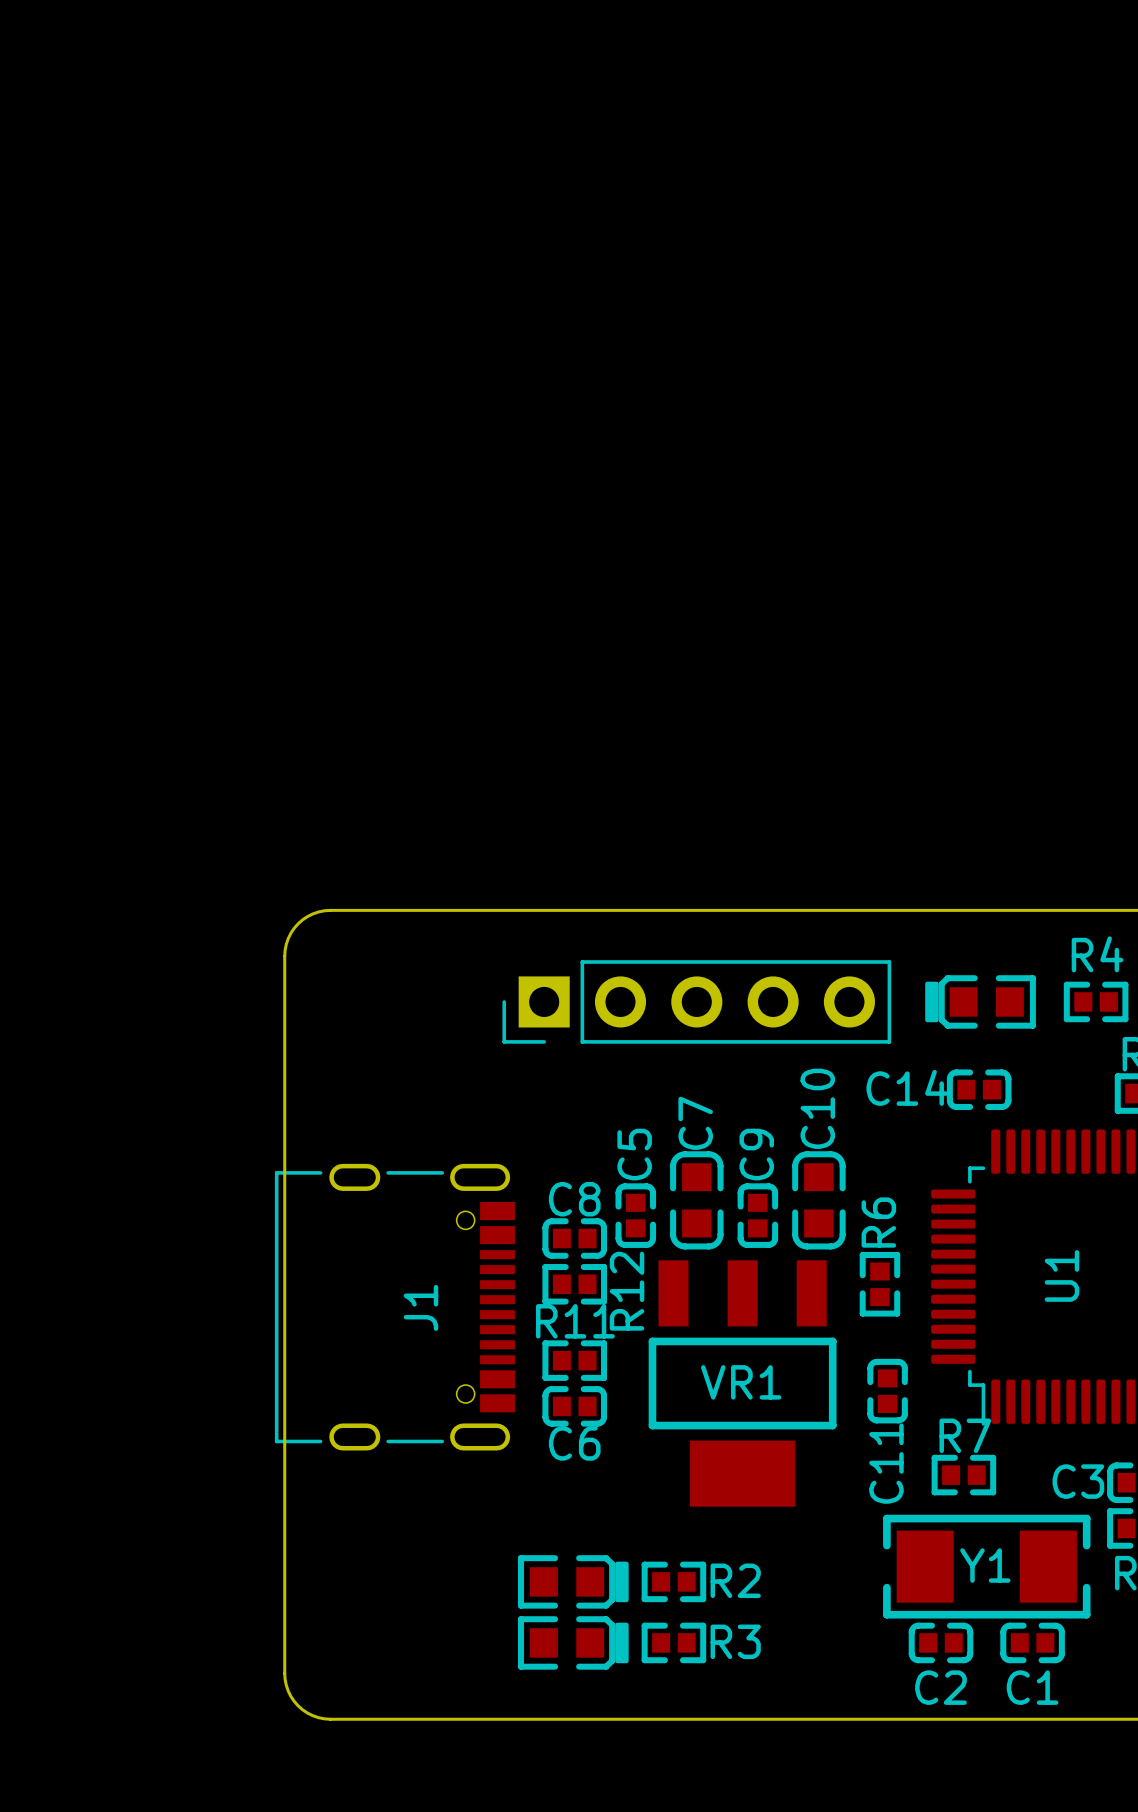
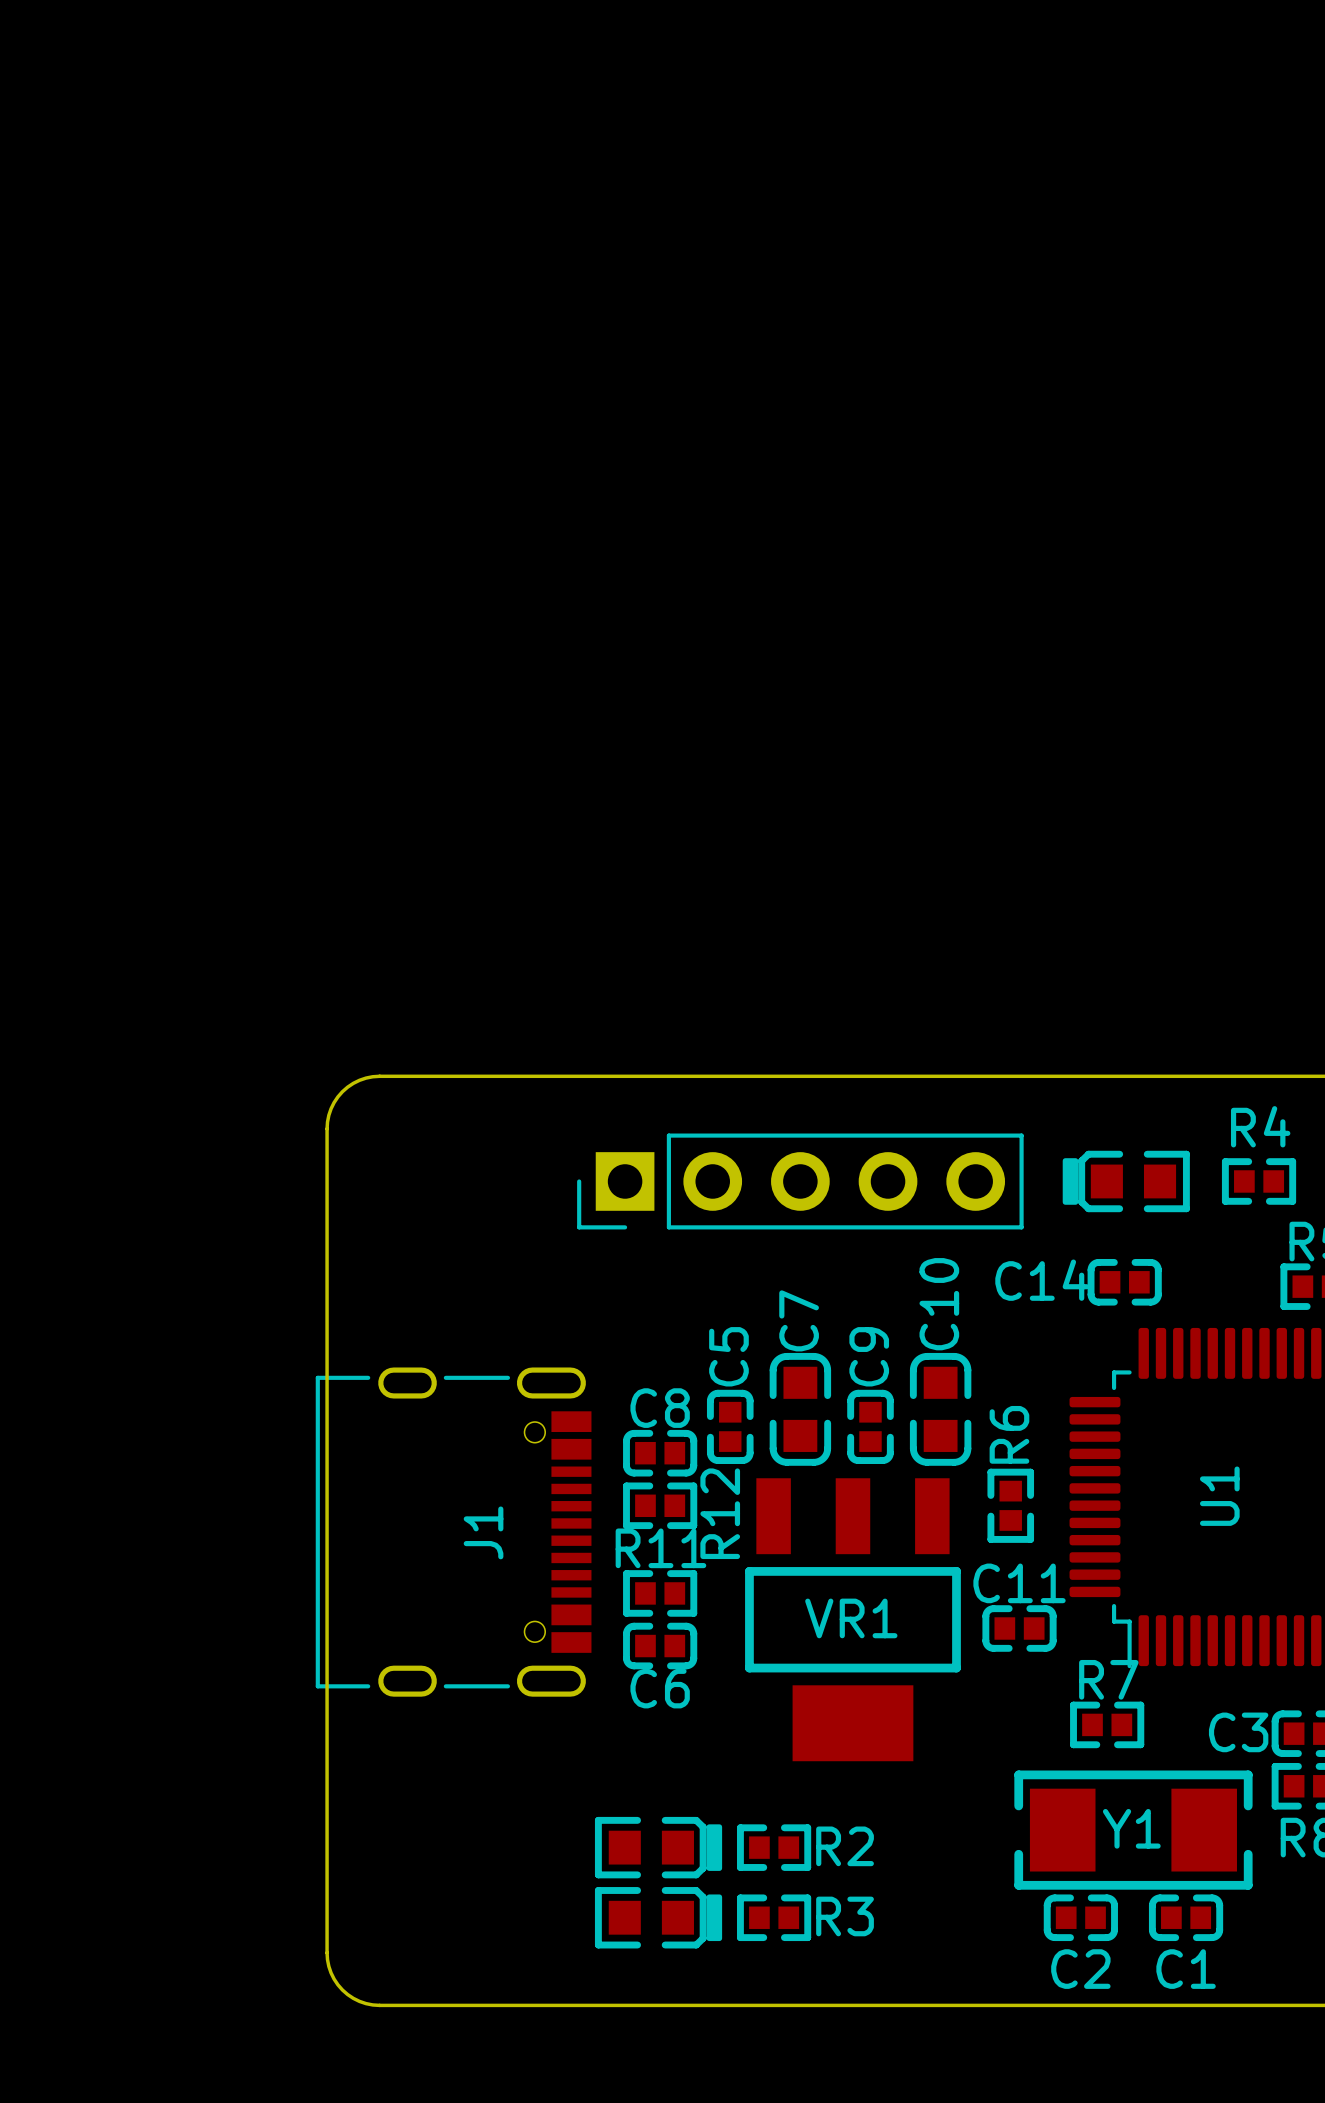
C11 rotation: 0° (887, 1391) -> 90° clockwise (1019, 1628)
C11 name position: C11 (886, 1463) -> C11 (1019, 1583)

